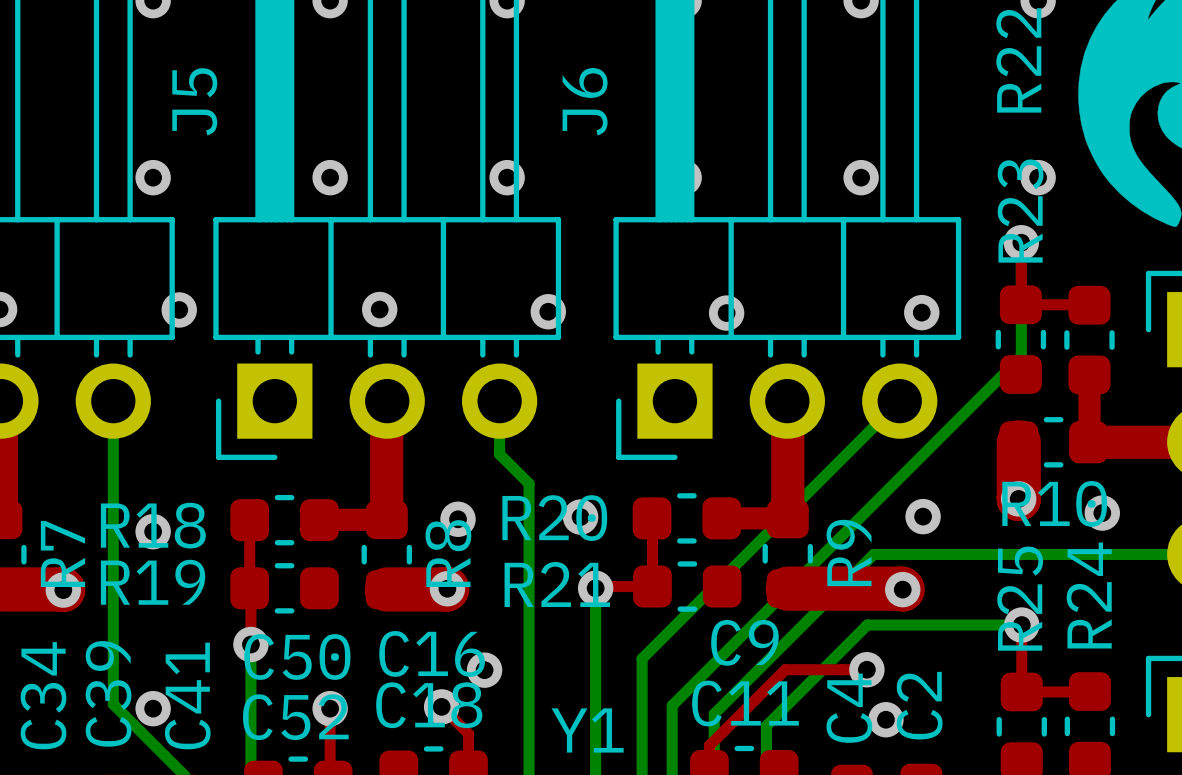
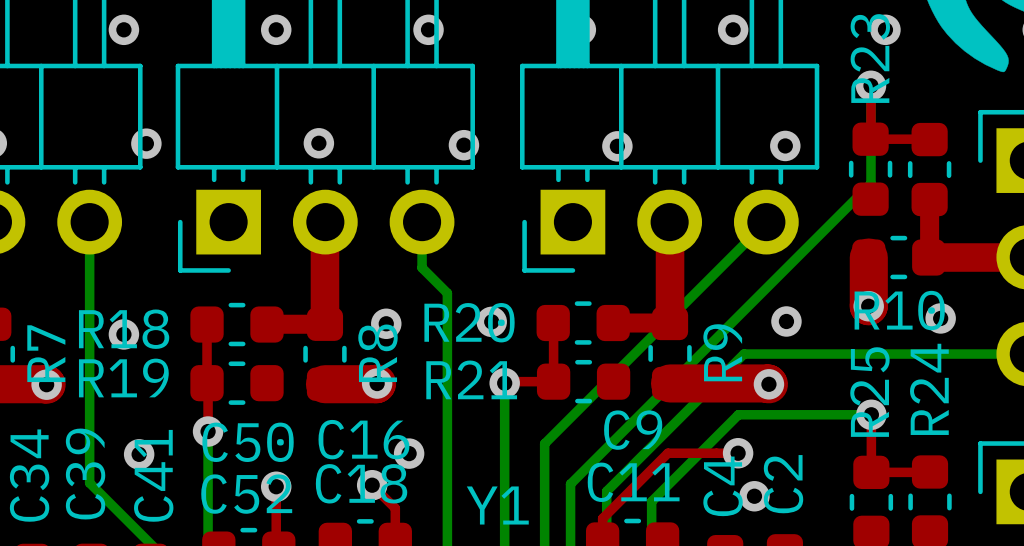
via position: (153, 708) -> (139, 454)

